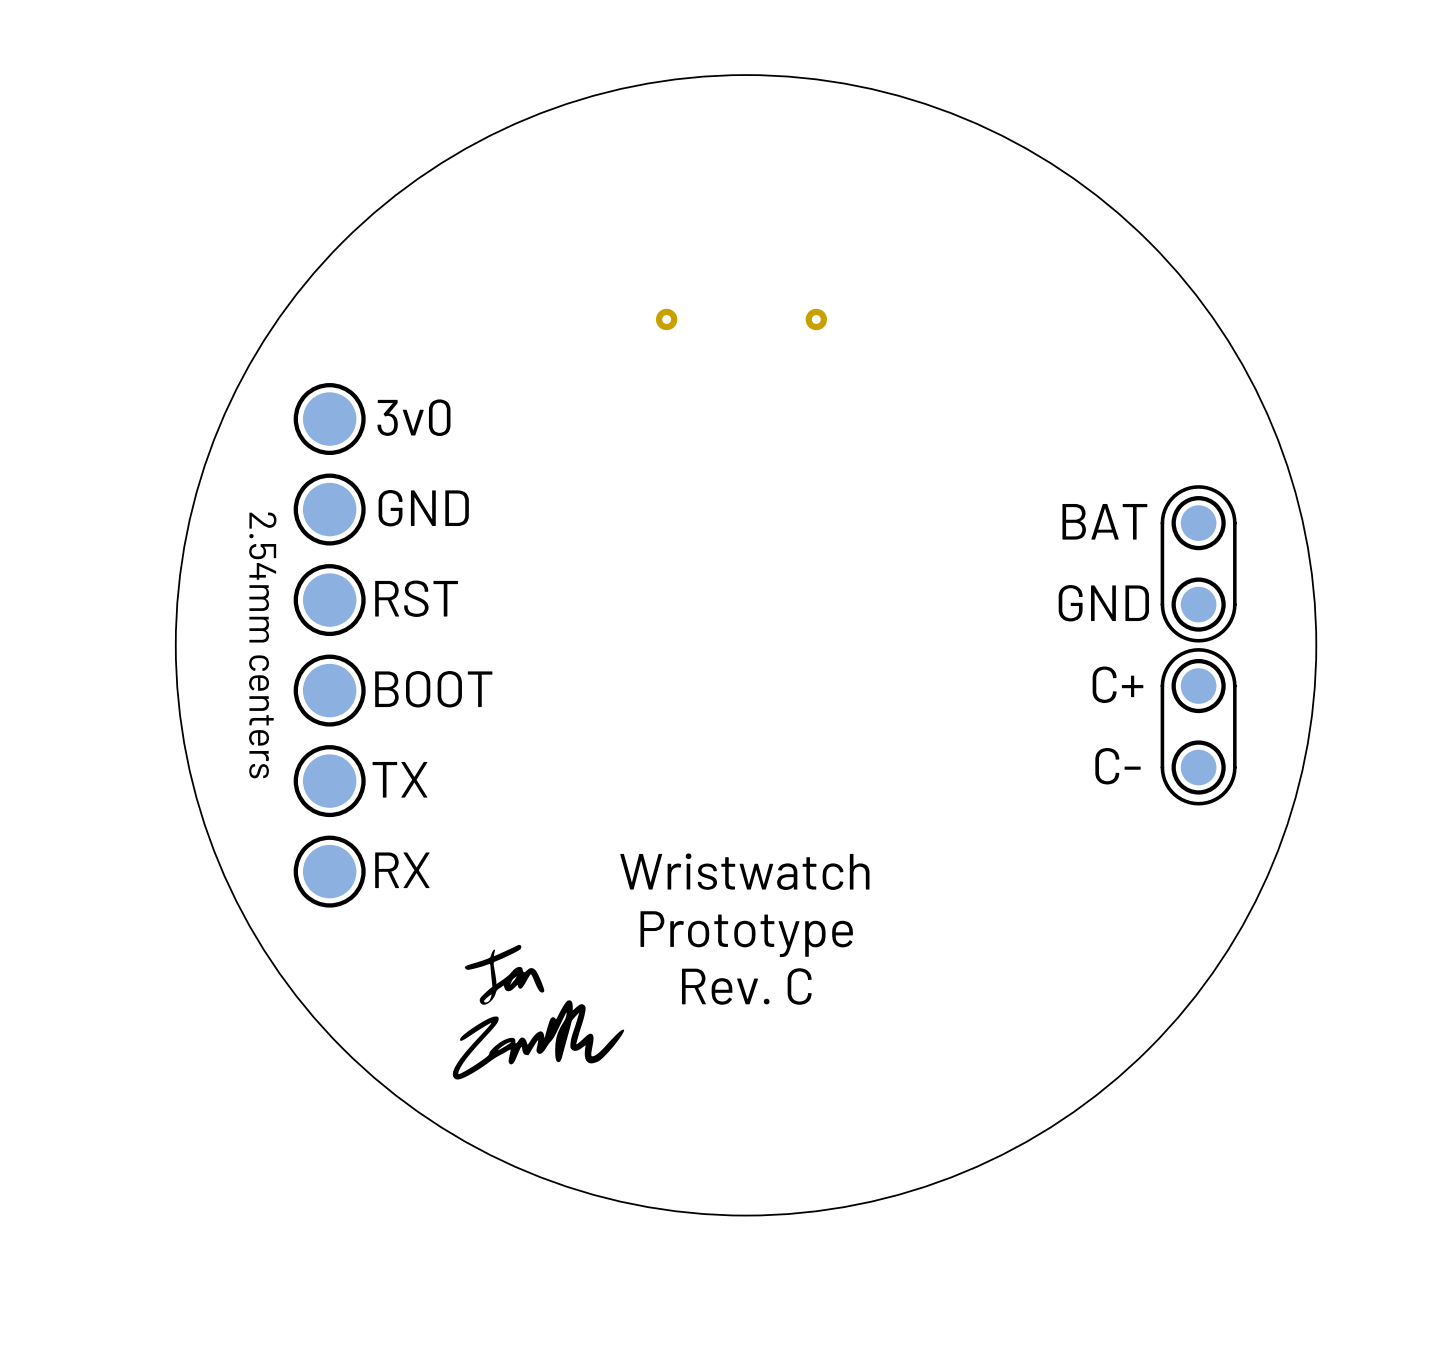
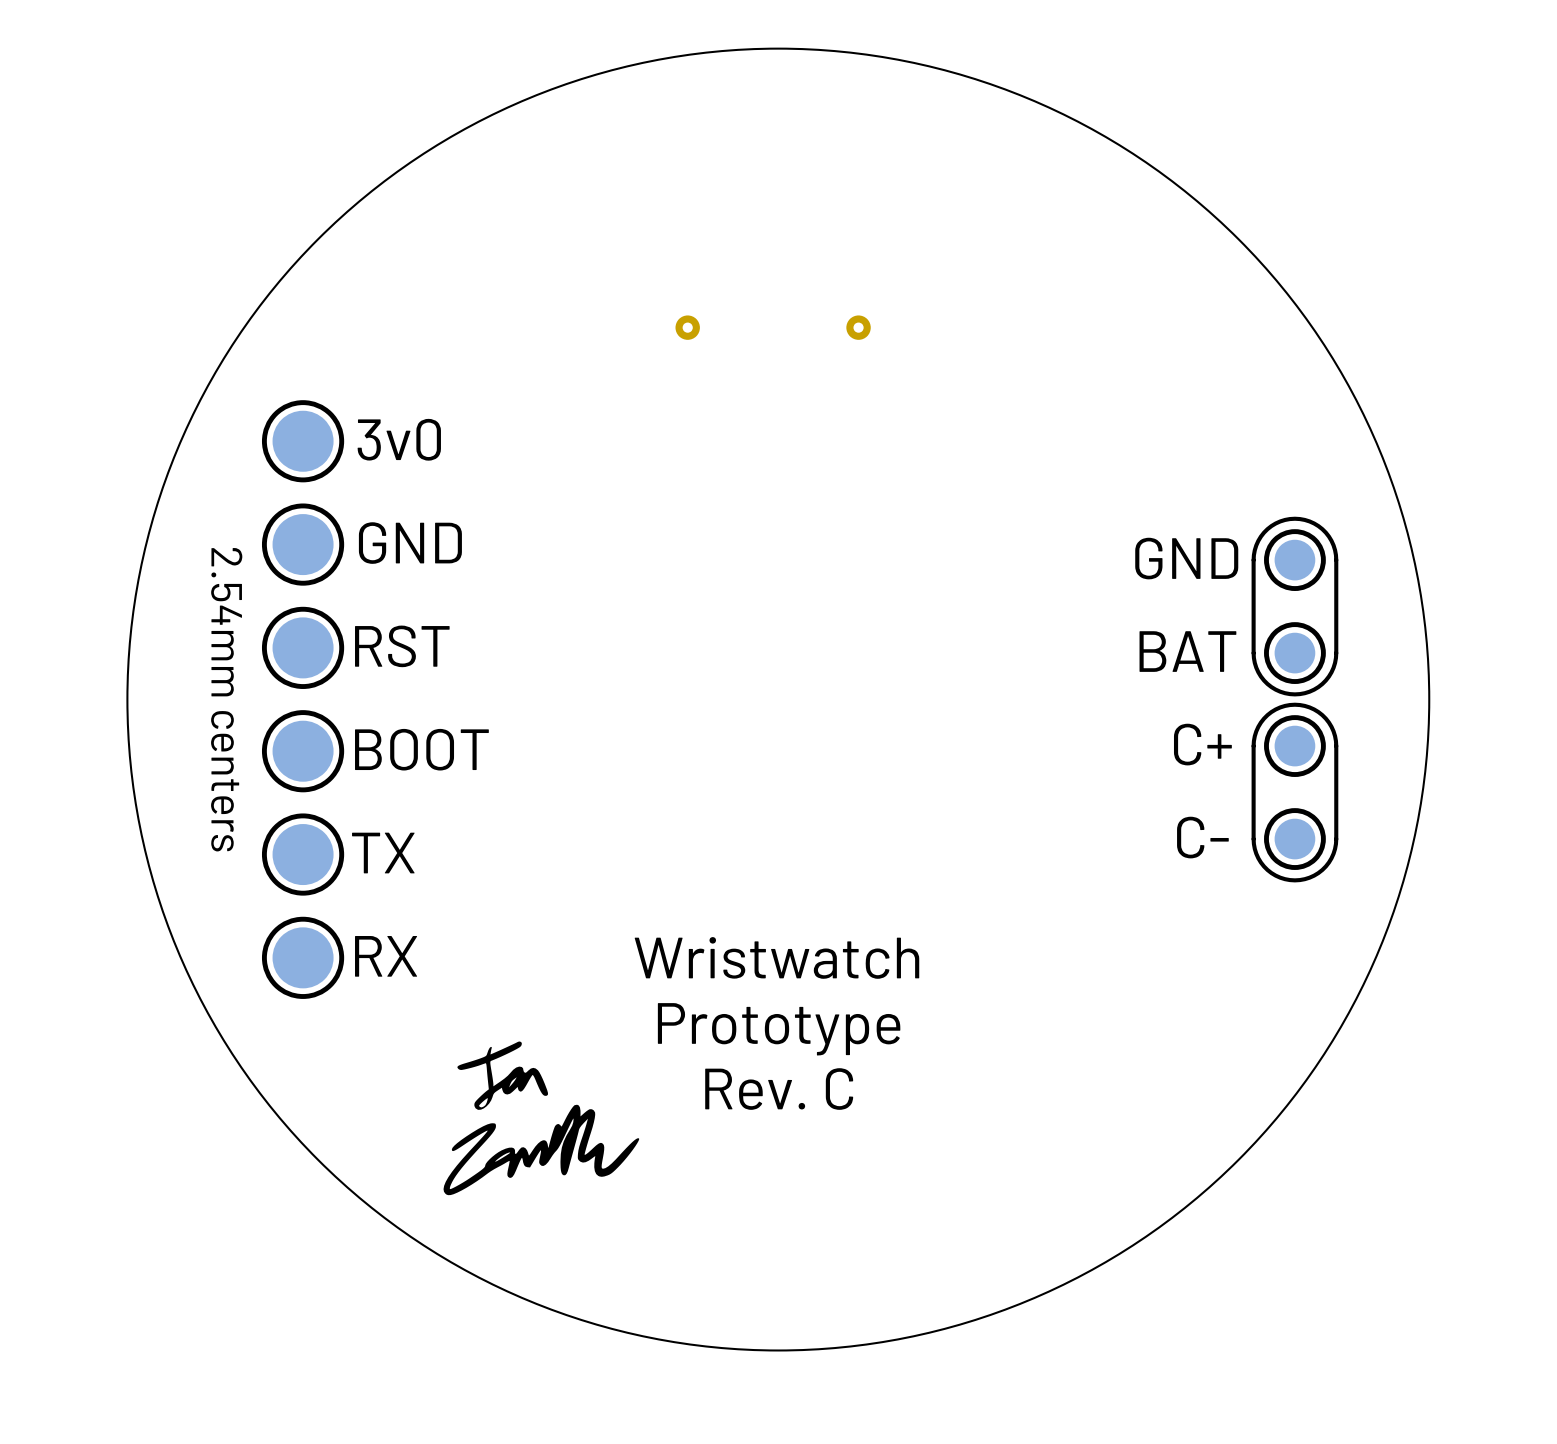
text: BAT (1104, 521) -> GND (1186, 558)
text: GND (1103, 603) -> BAT (1187, 651)

